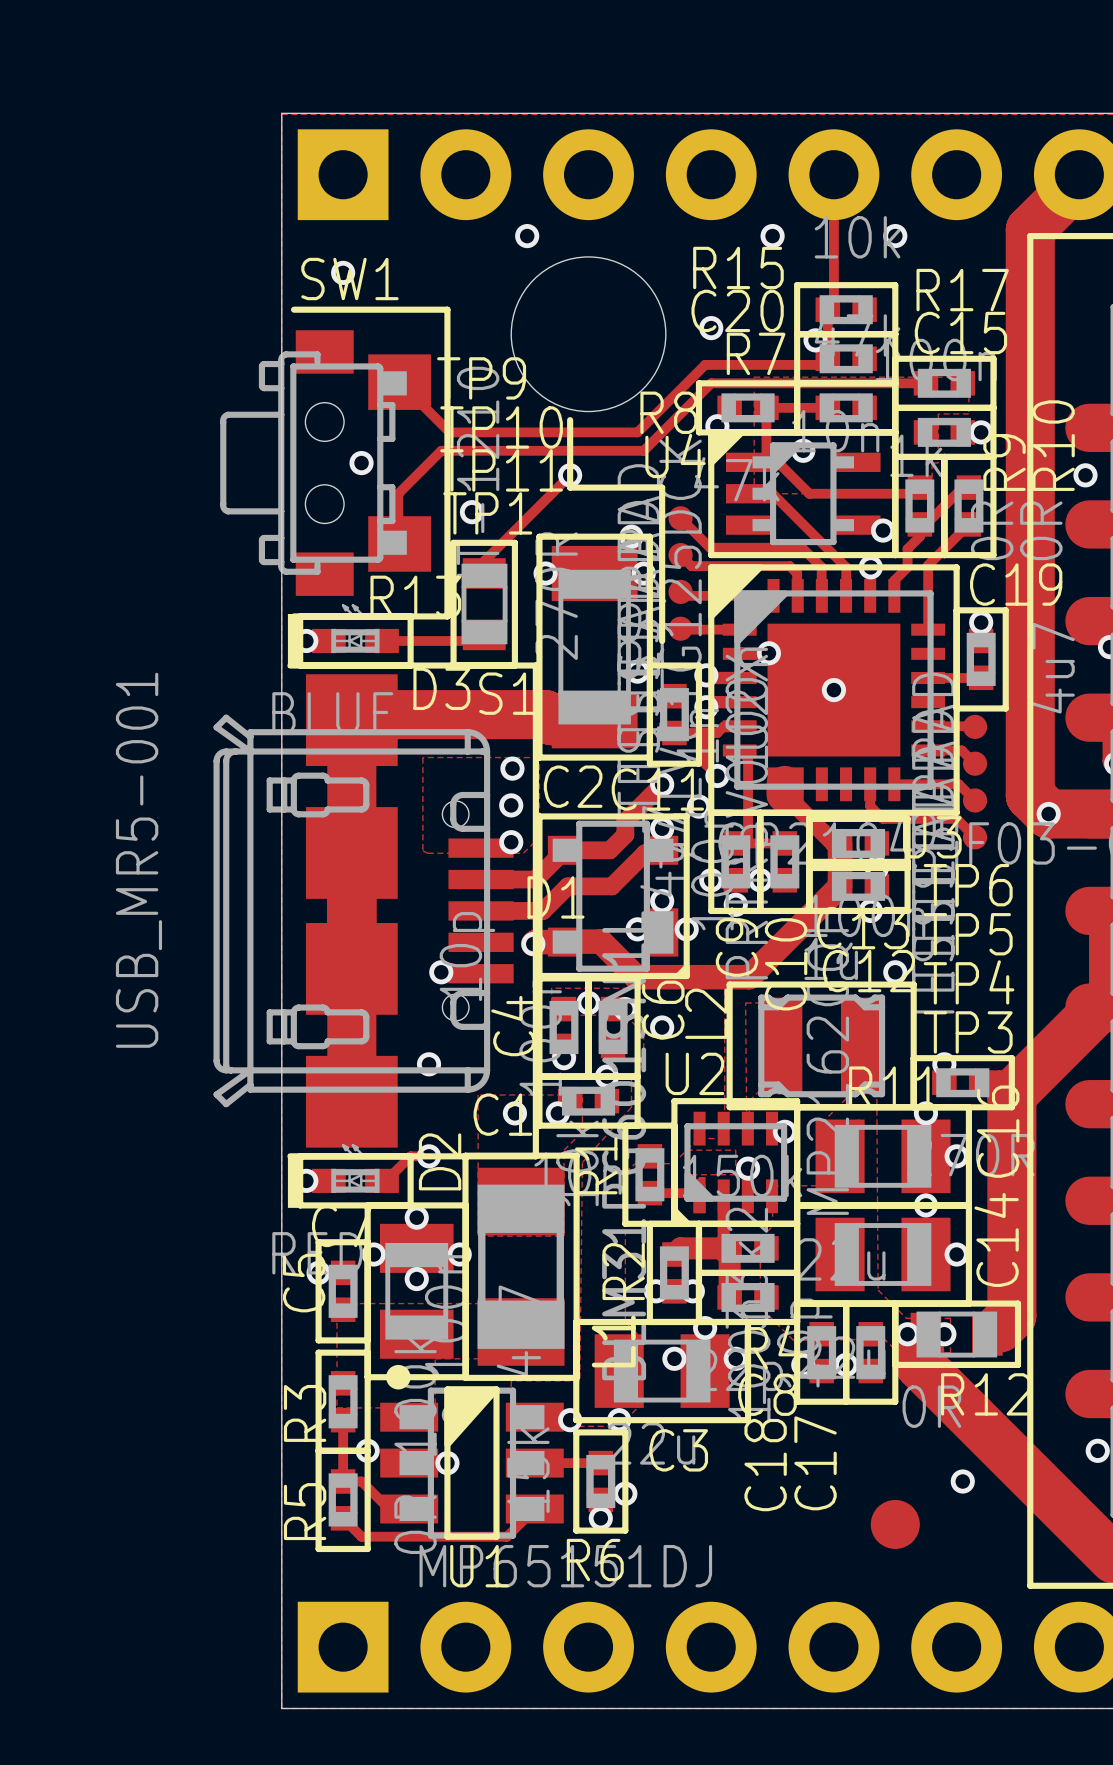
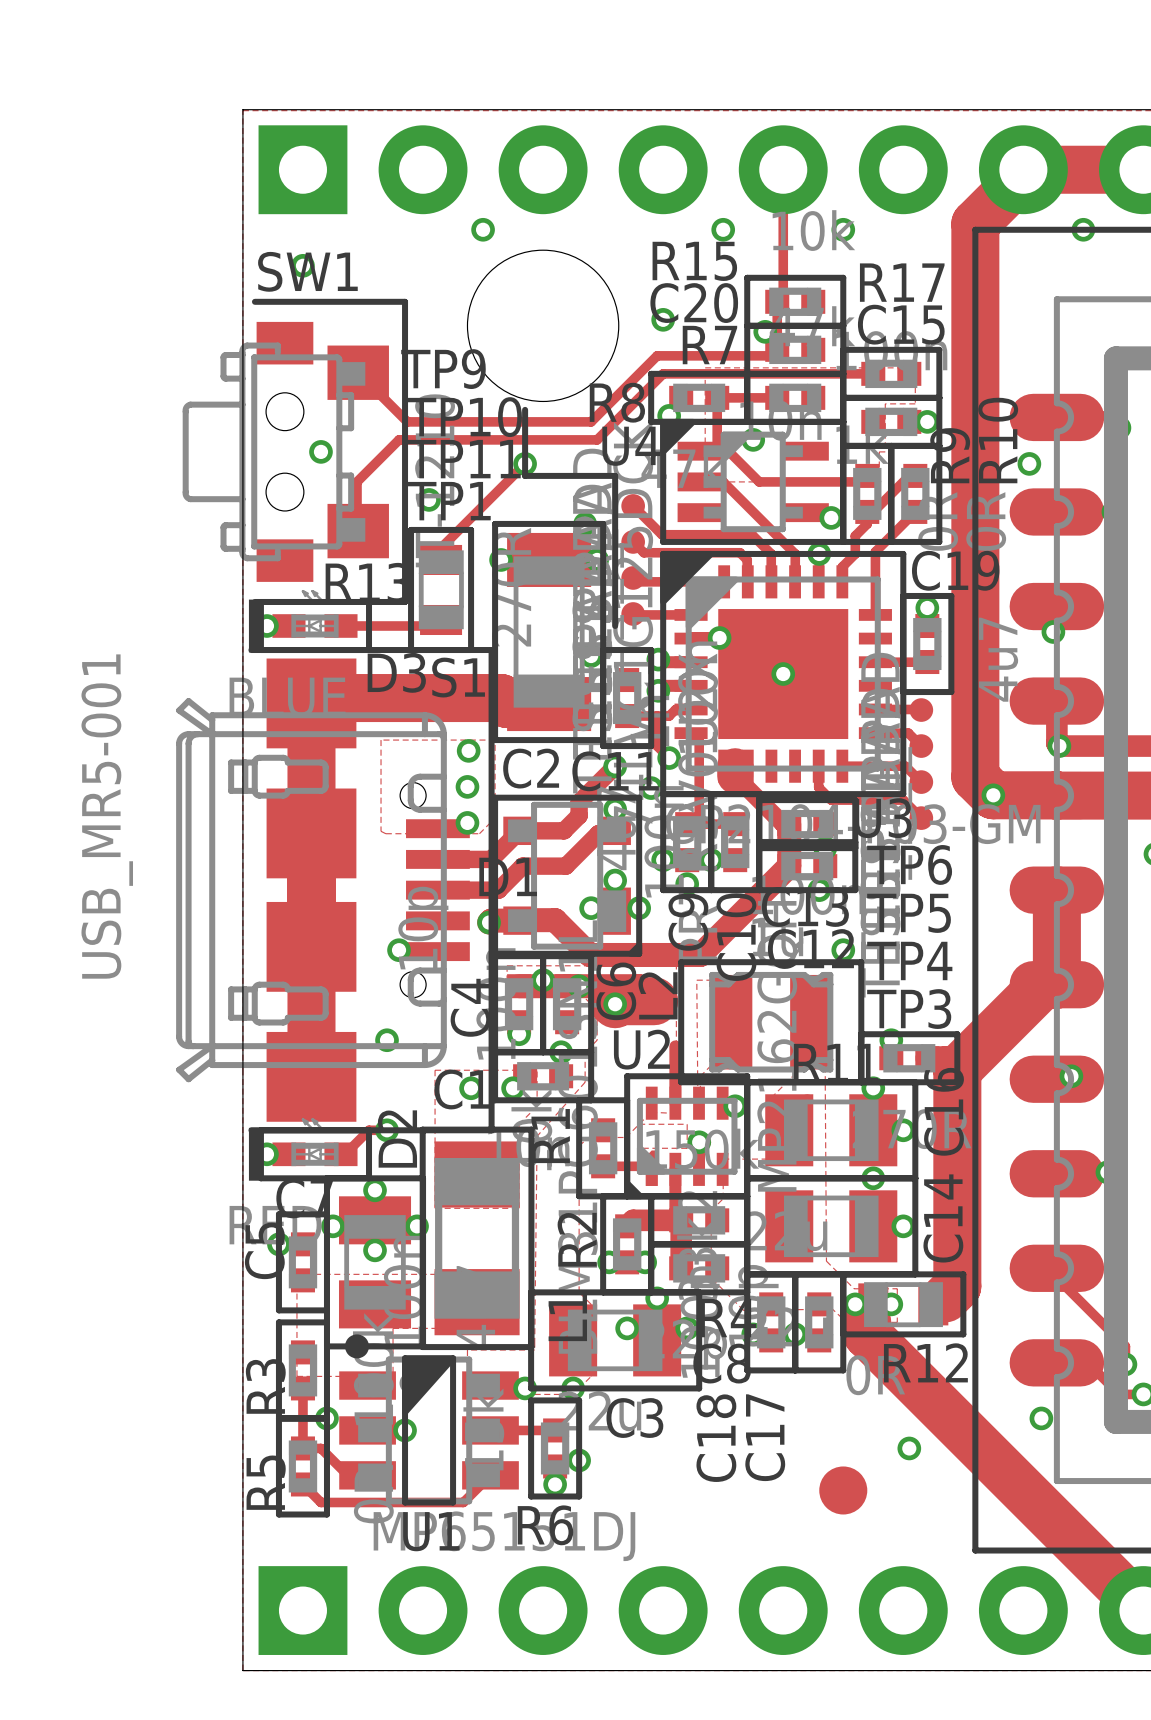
track: none -> (519, 986) (639, 986) (654, 1001) (612, 1001) (615, 1004)
track: none -> (675, 1046) (675, 1103)

